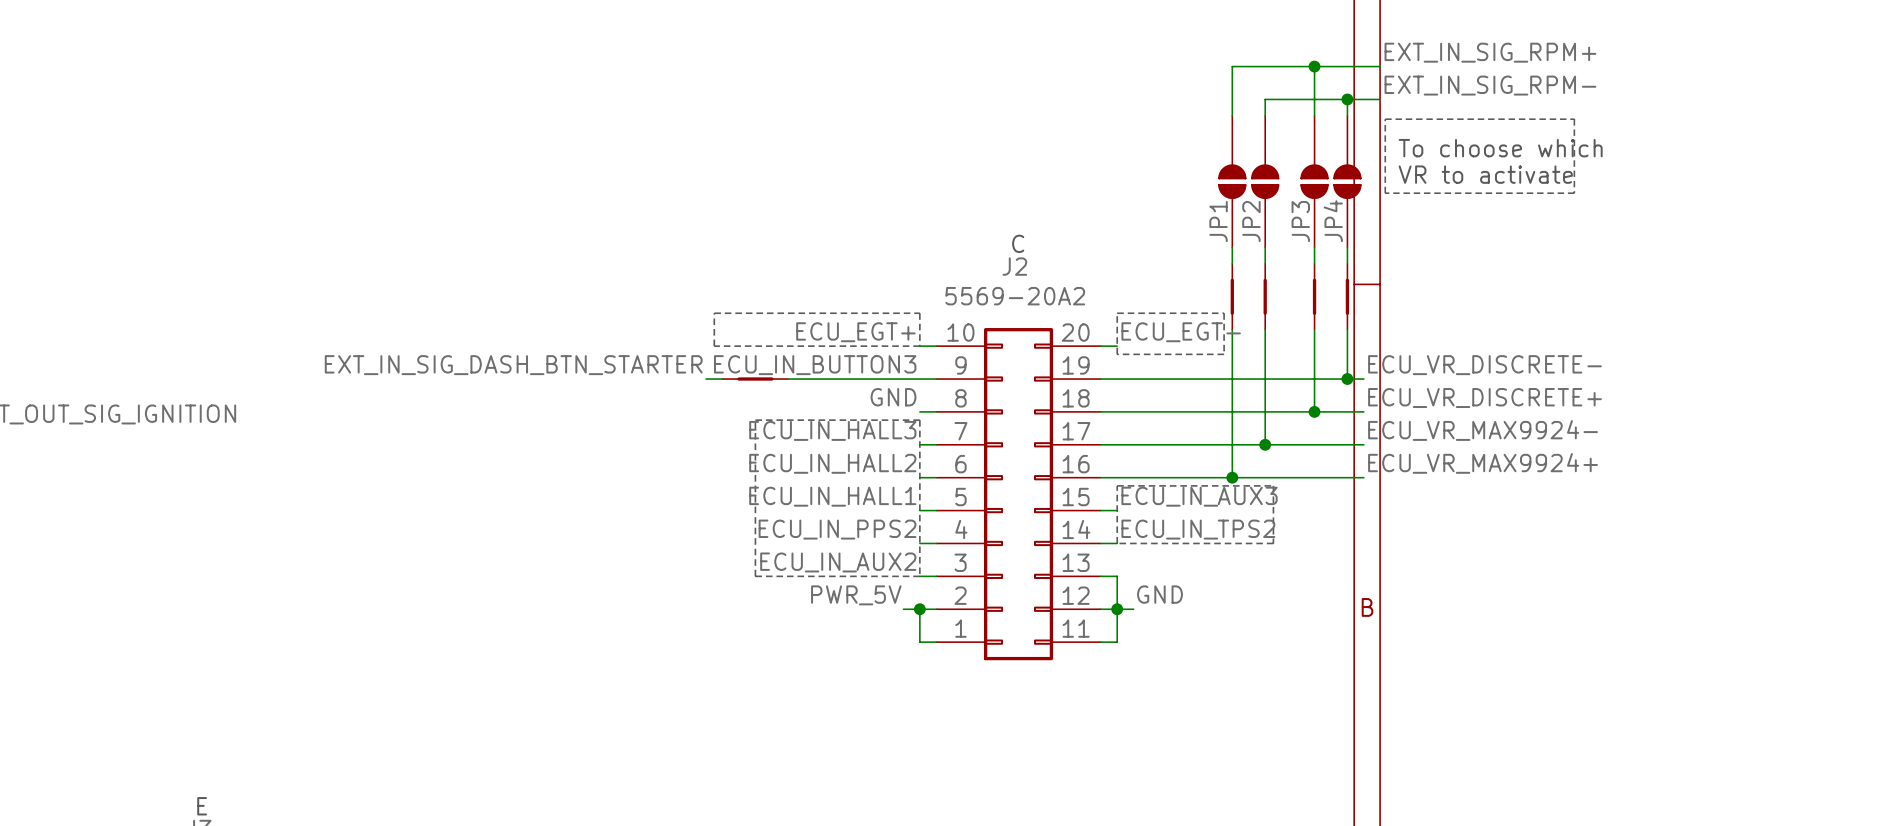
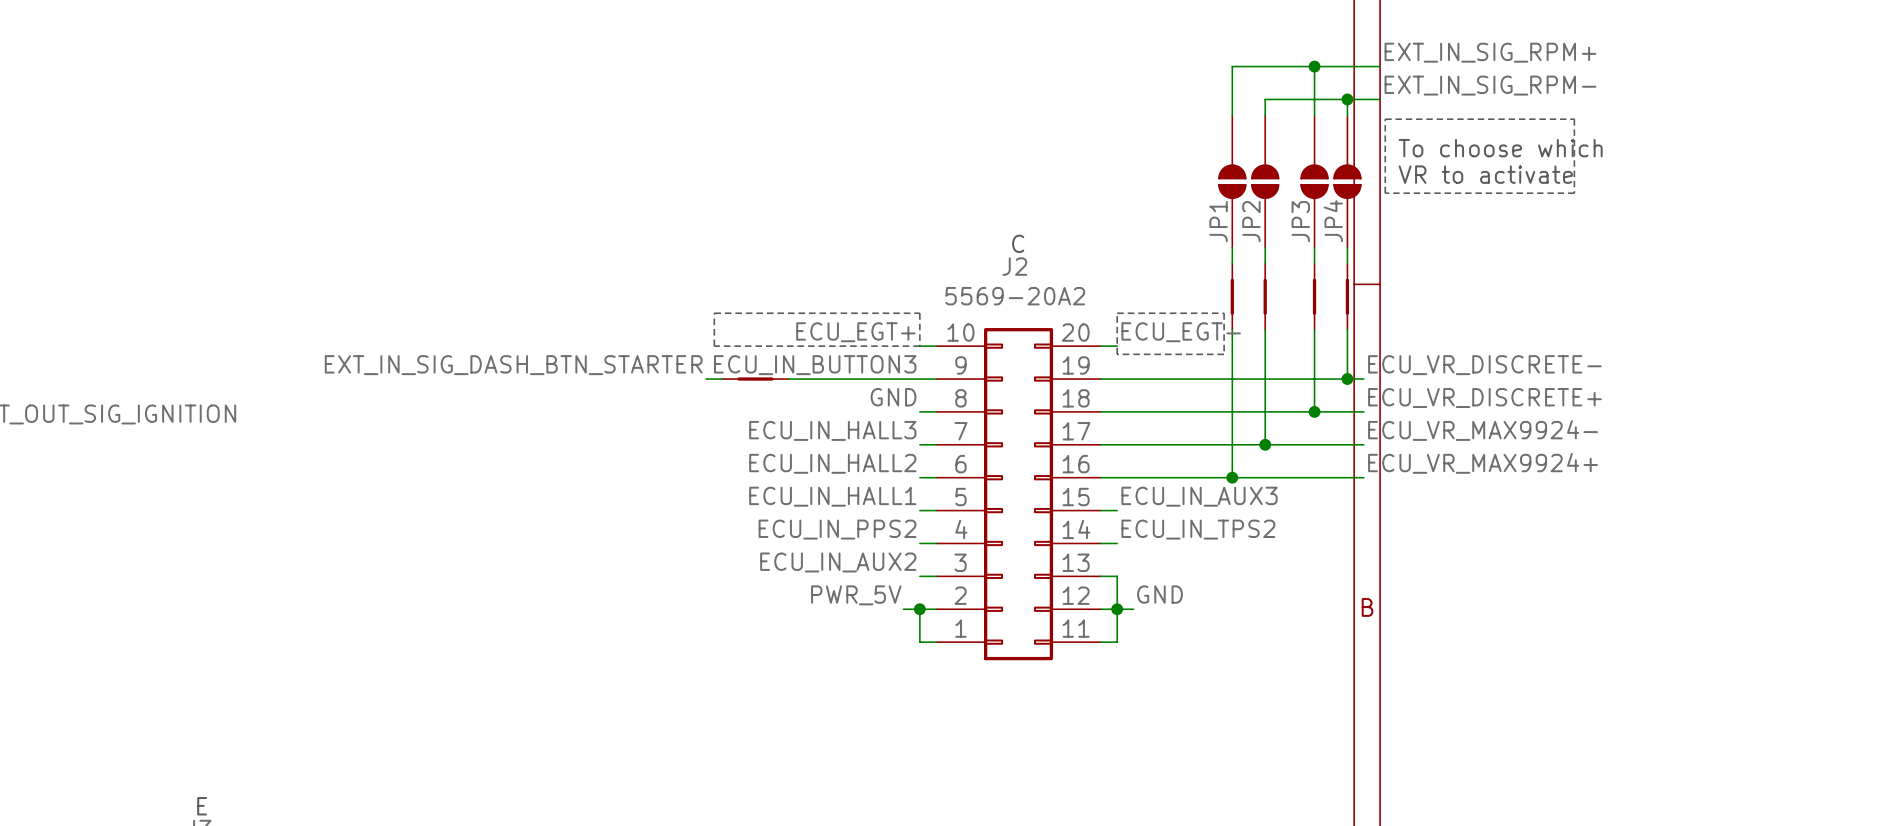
line: (755, 420) (919, 420) (919, 576) (755, 576) (755, 420) -> none
line: (1117, 485) (1273, 485) (1273, 543) (1117, 543) (1117, 485) -> none

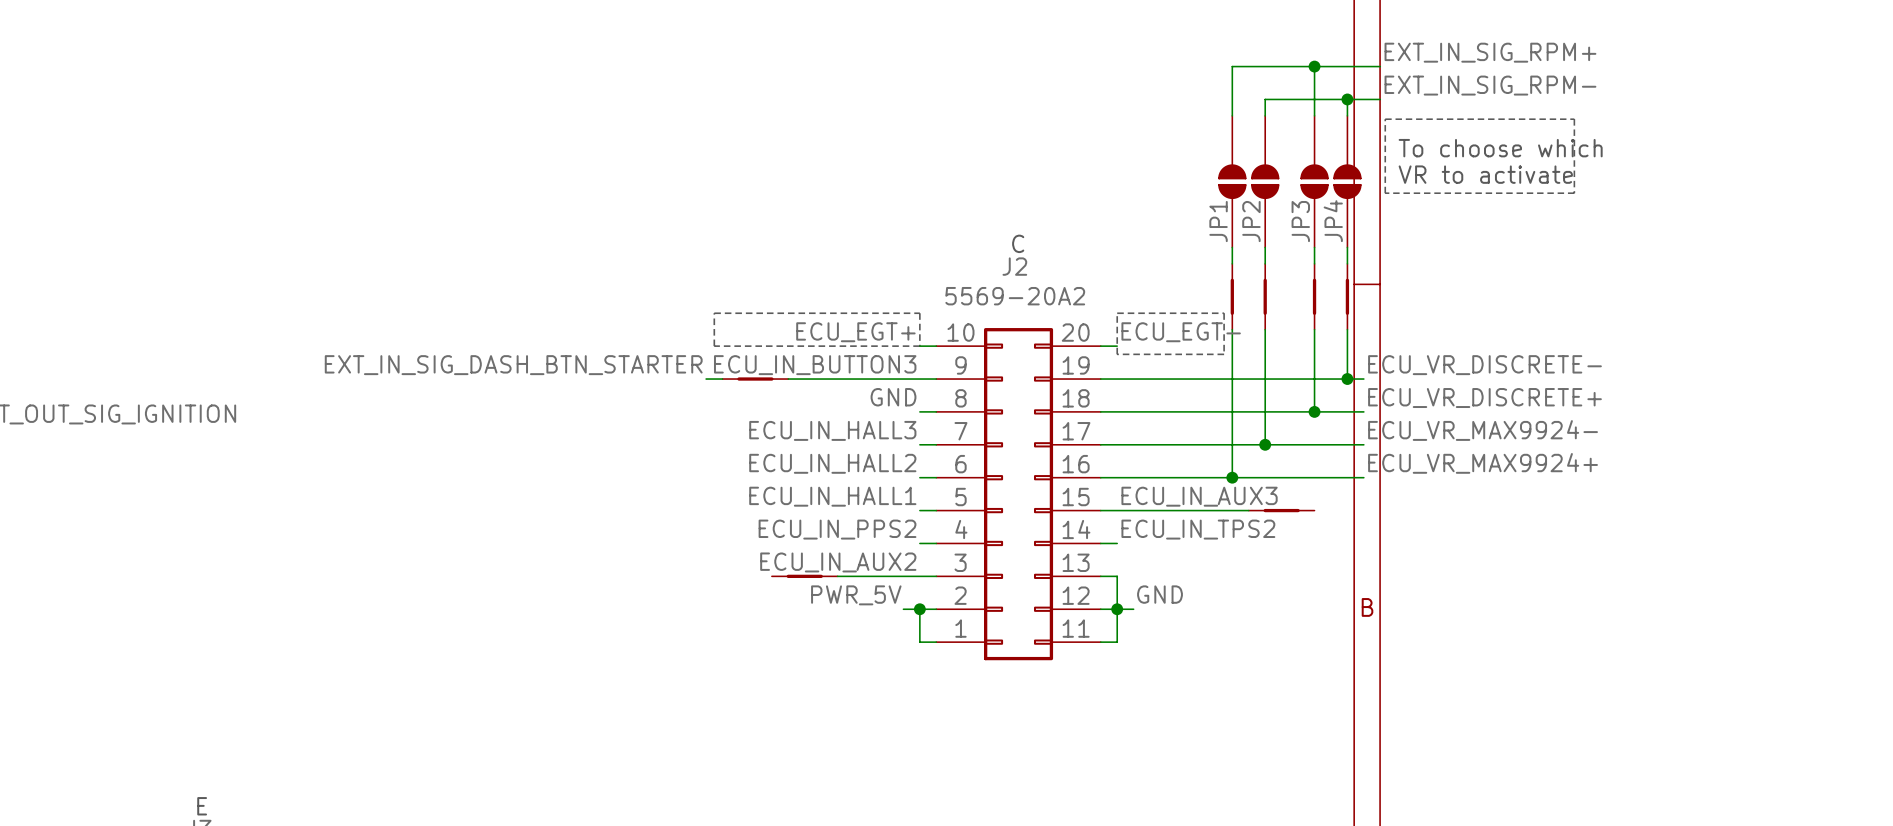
wire: none -> (1117, 510) (1248, 510)
part: none -> (1281, 510)
part: none -> (804, 576)
wire: none -> (837, 576) (919, 576)

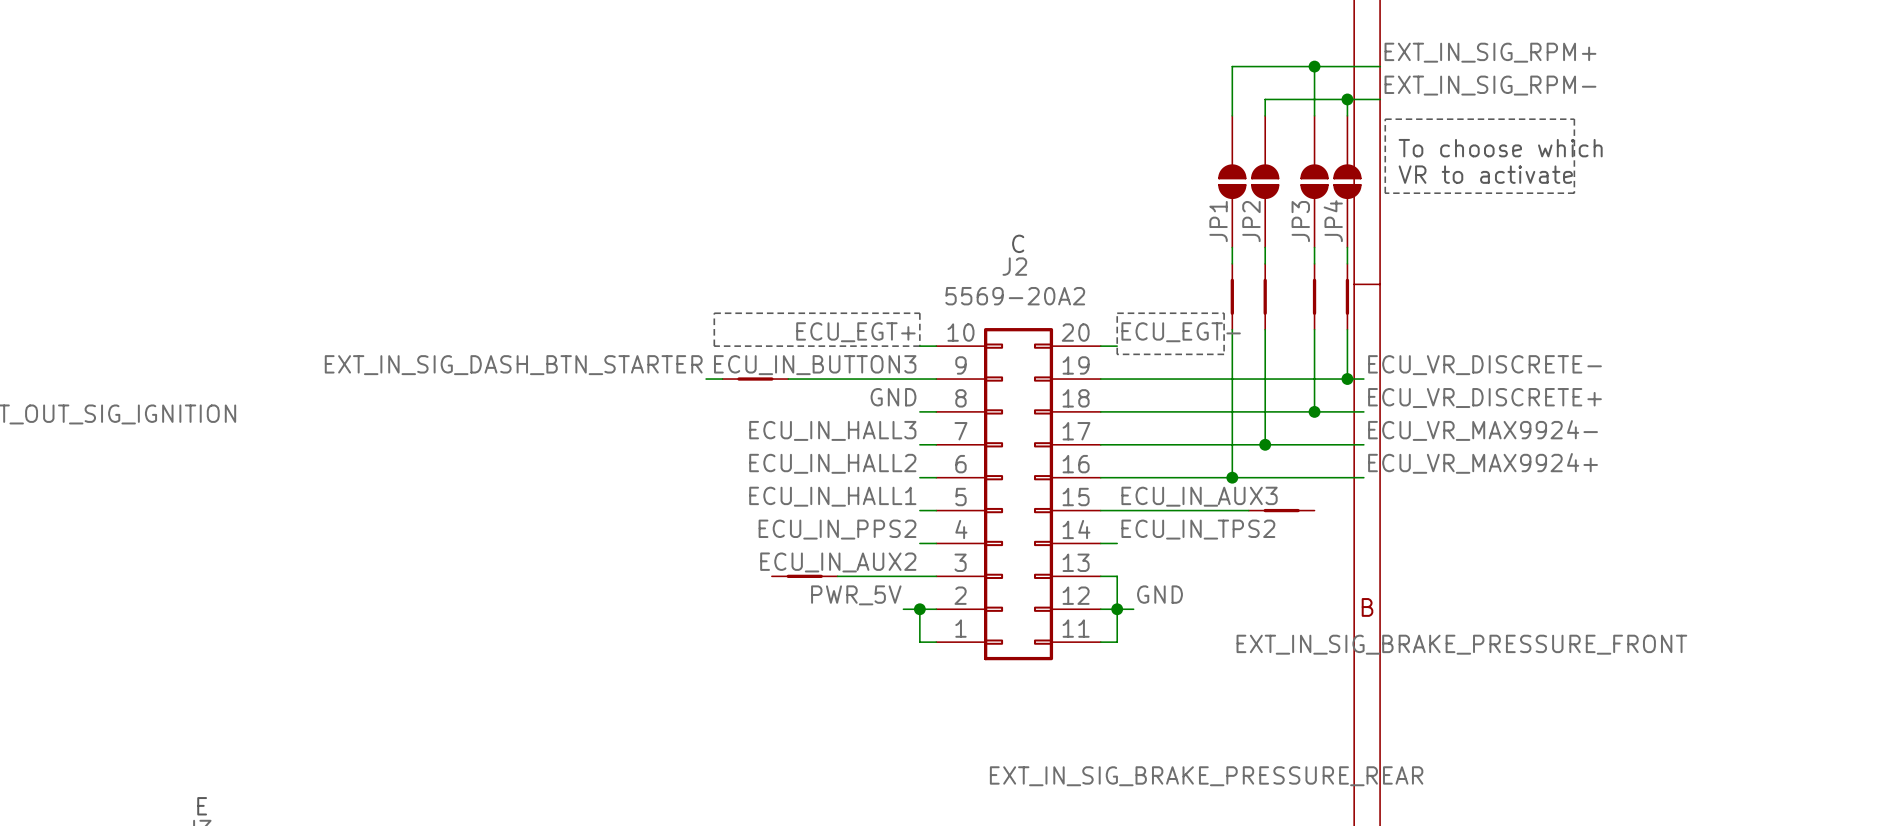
label: none -> EXT_IN_SIG_BRAKE_PRESSURE_FRONT (1461, 644)
label: none -> EXT_IN_SIG_BRAKE_PRESSURE_REAR (1206, 776)

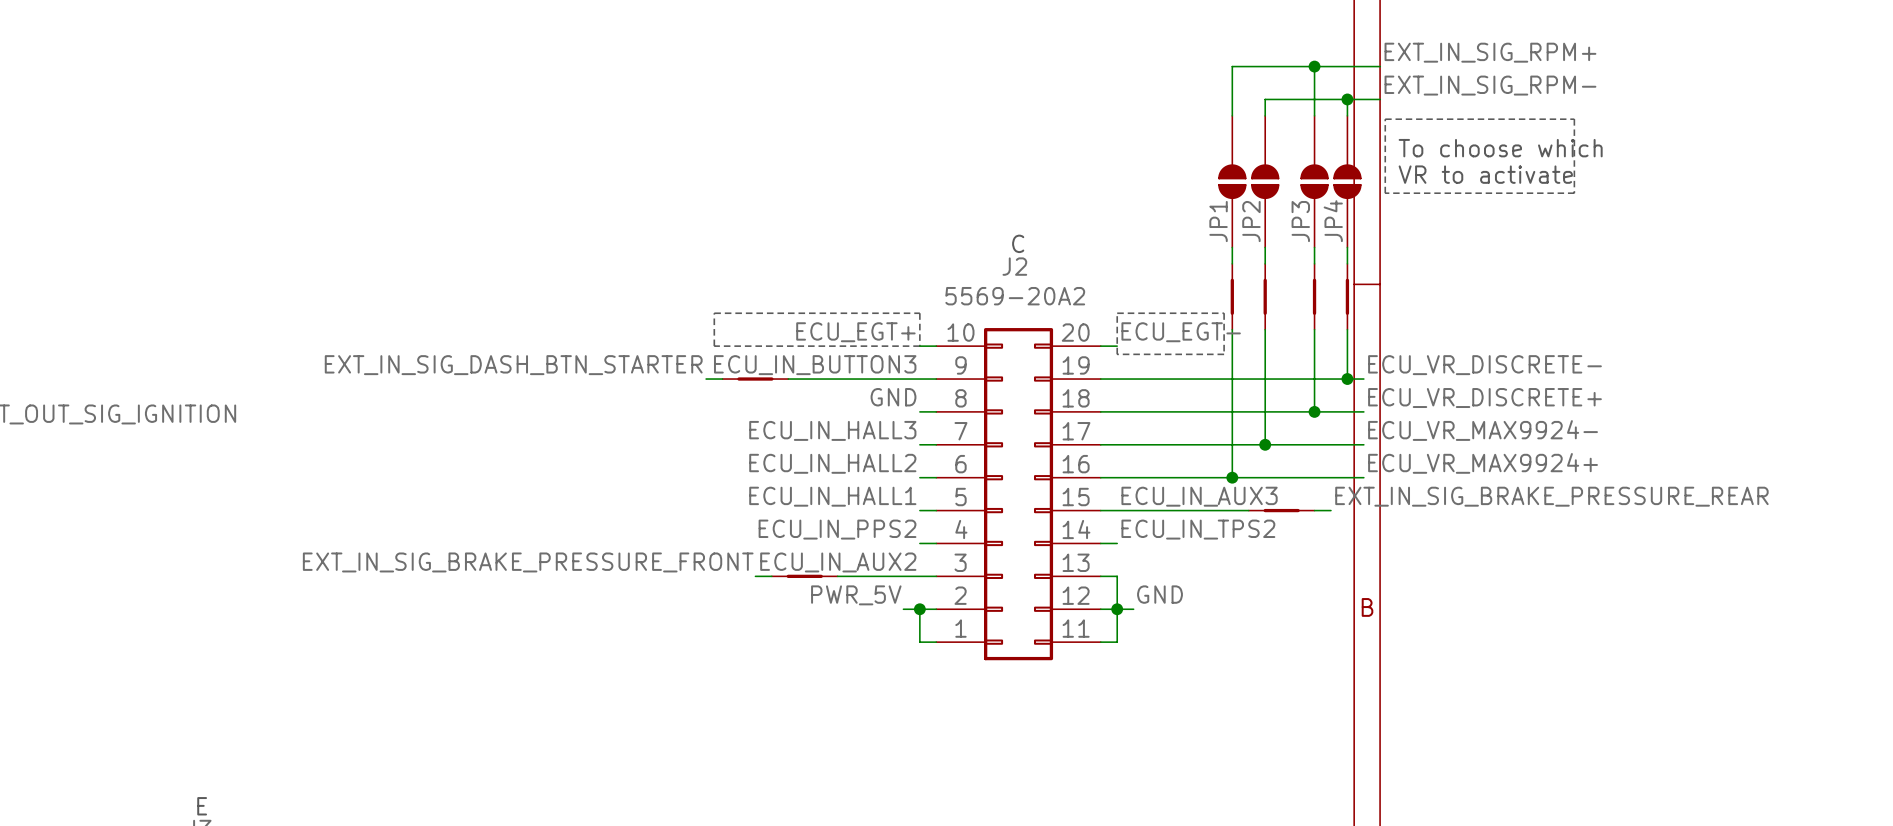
label: none -> EXT_IN_SIG_BRAKE_PRESSURE_REAR (1551, 496)
wire: none -> (1314, 510) (1330, 510)
label: none -> EXT_IN_SIG_BRAKE_PRESSURE_FRONT (528, 562)
wire: none -> (755, 576) (771, 576)
label: EXT_IN_SIG_BRAKE_PRESSURE_FRONT (1461, 644) -> none
label: EXT_IN_SIG_BRAKE_PRESSURE_REAR (1206, 776) -> none

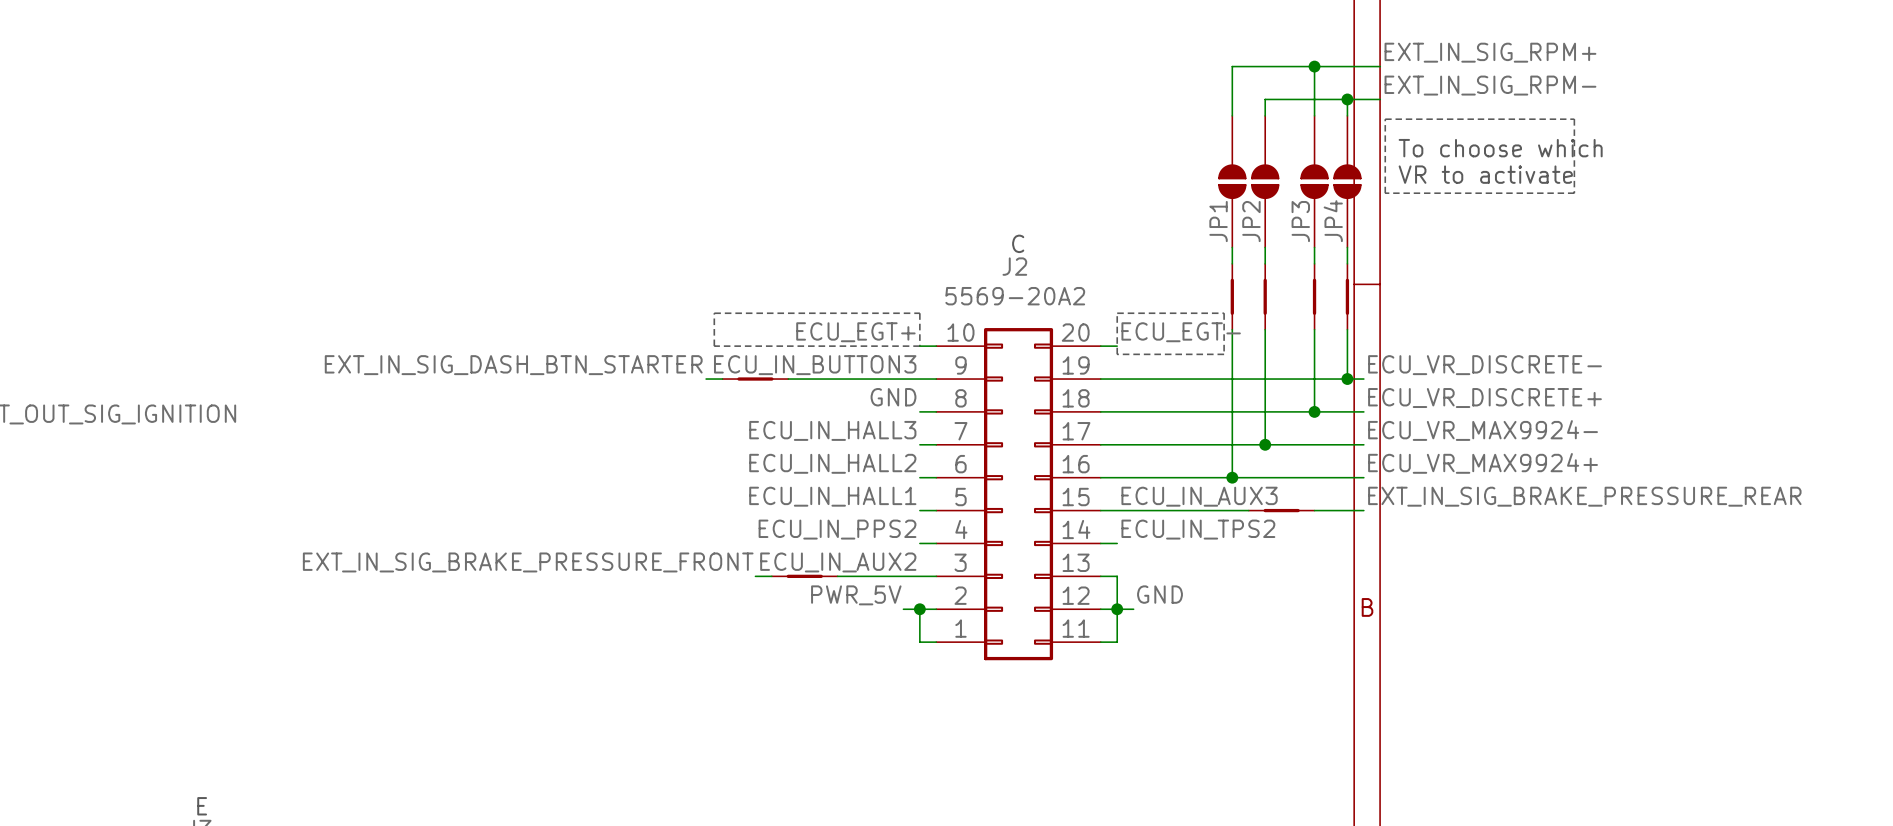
label position: EXT_IN_SIG_BRAKE_PRESSURE_REAR (1551, 496) -> EXT_IN_SIG_BRAKE_PRESSURE_REAR (1584, 496)
wire: none -> (1330, 510) (1363, 510)

